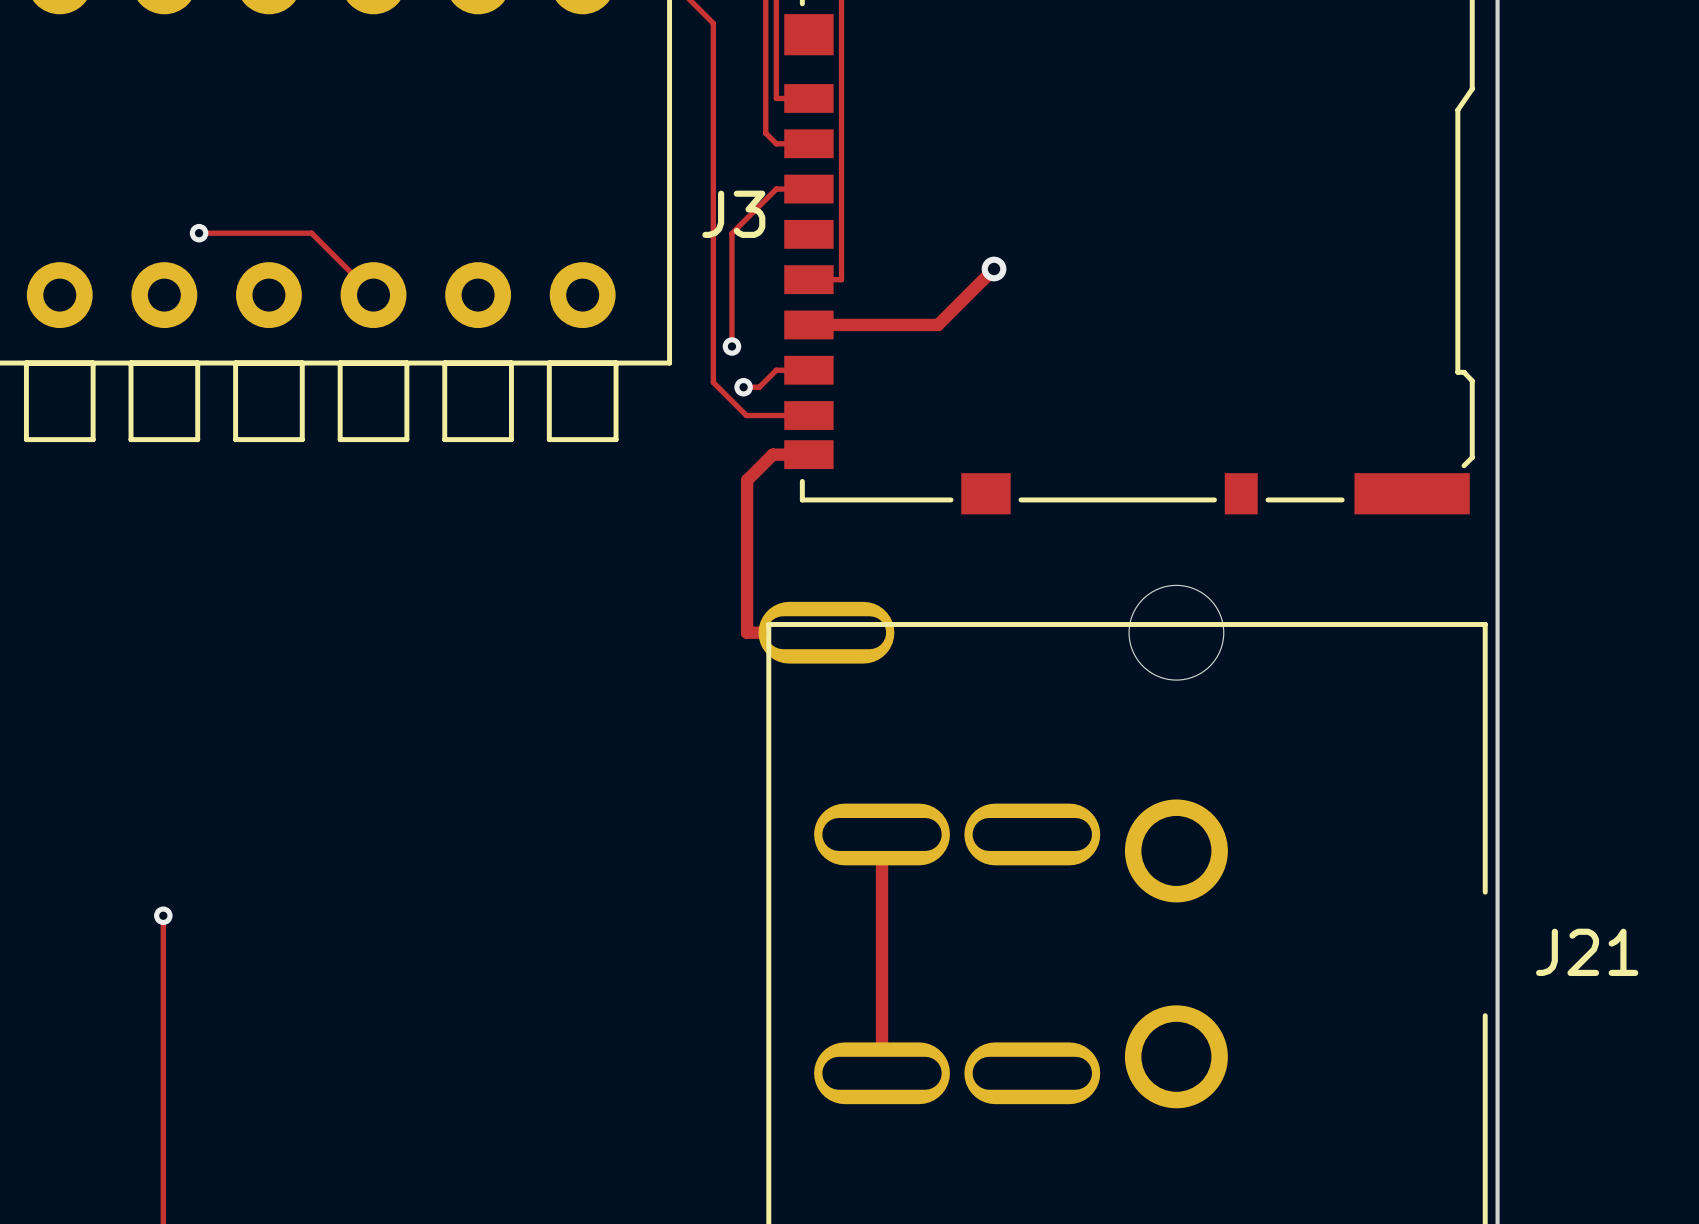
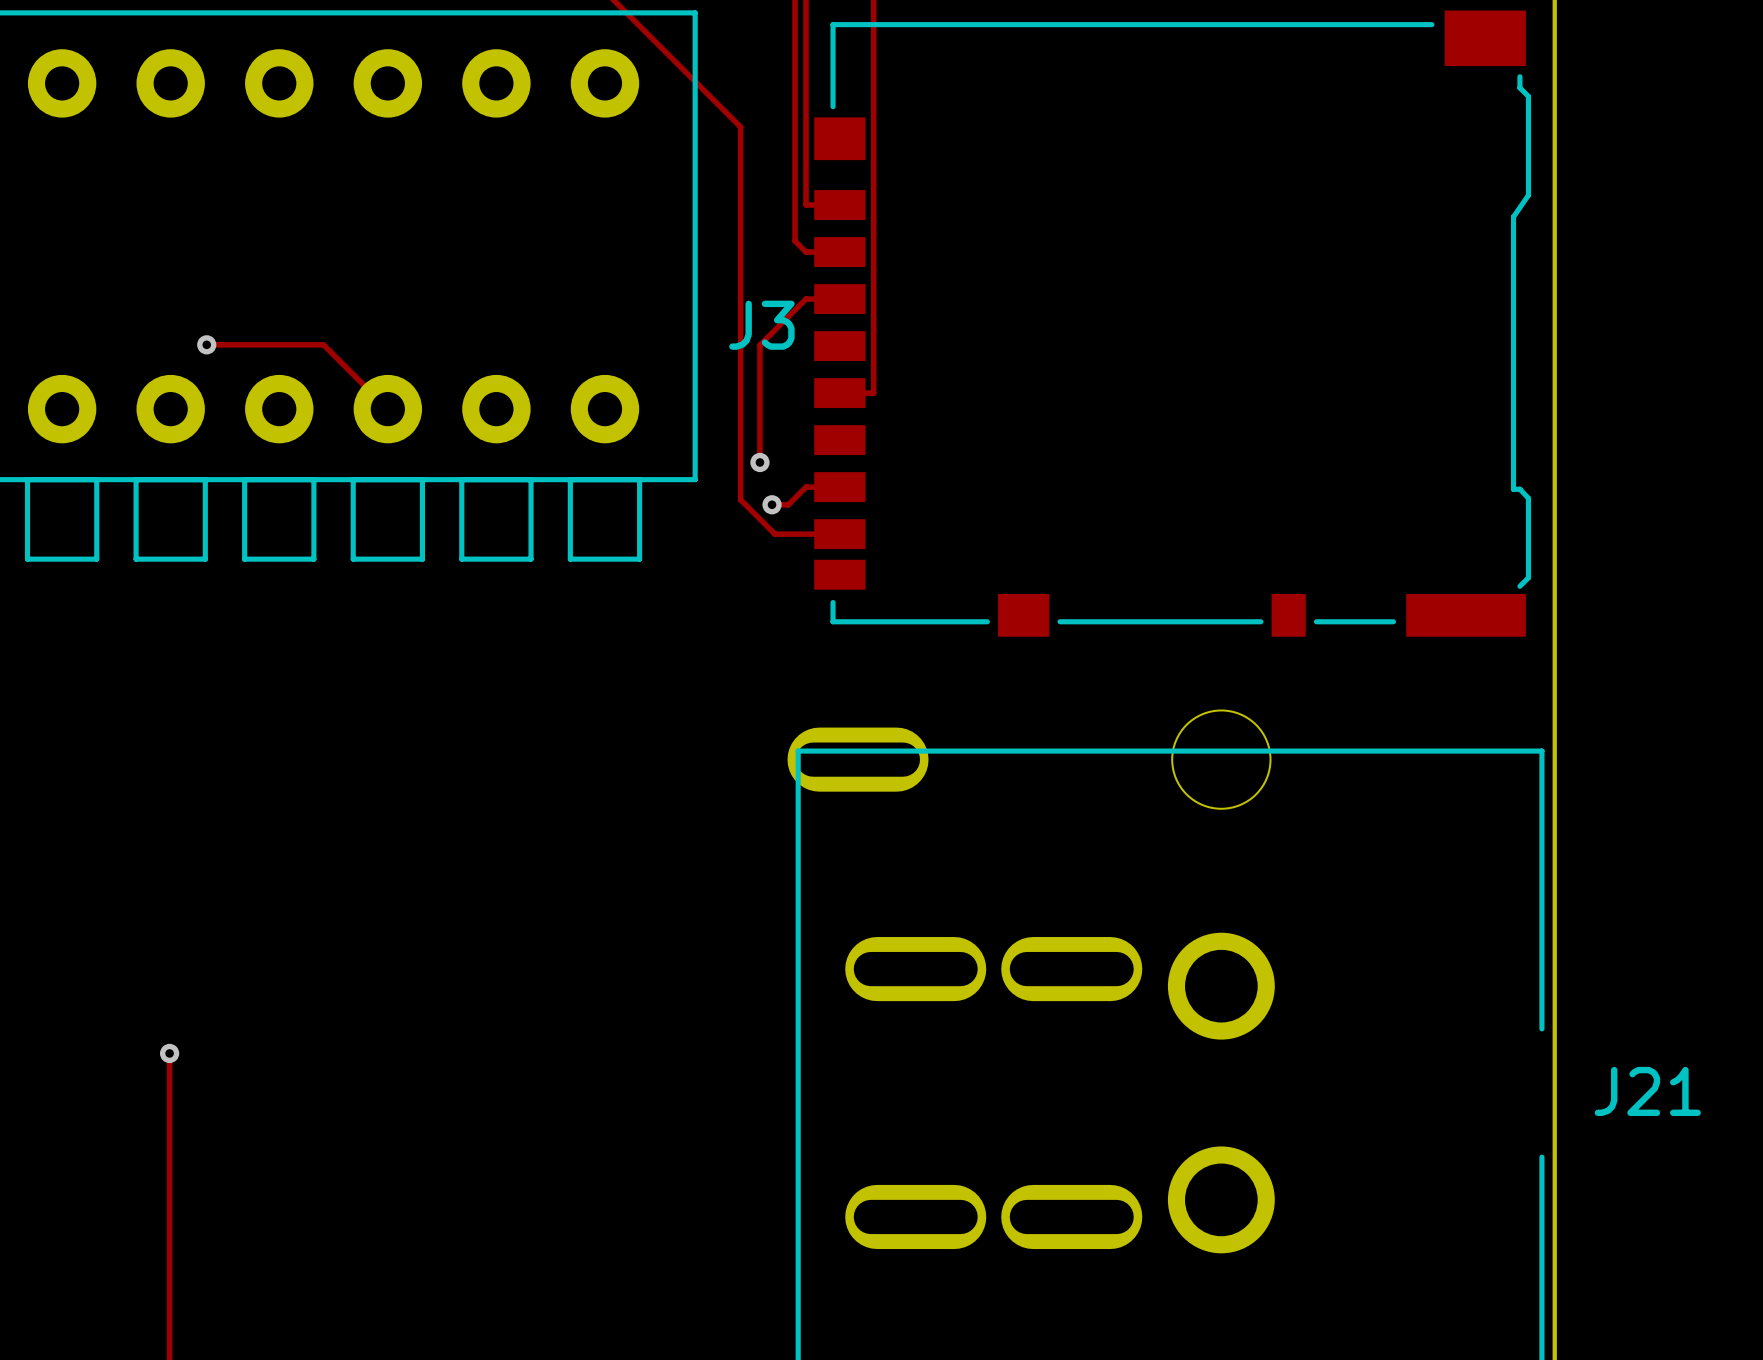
track: (994, 268) (938, 324) (808, 324) -> none
via: (994, 268) -> none
track: (808, 454) (772, 454) (747, 480) (747, 632) (826, 632) -> none
track: (882, 834) (882, 1073) -> none

